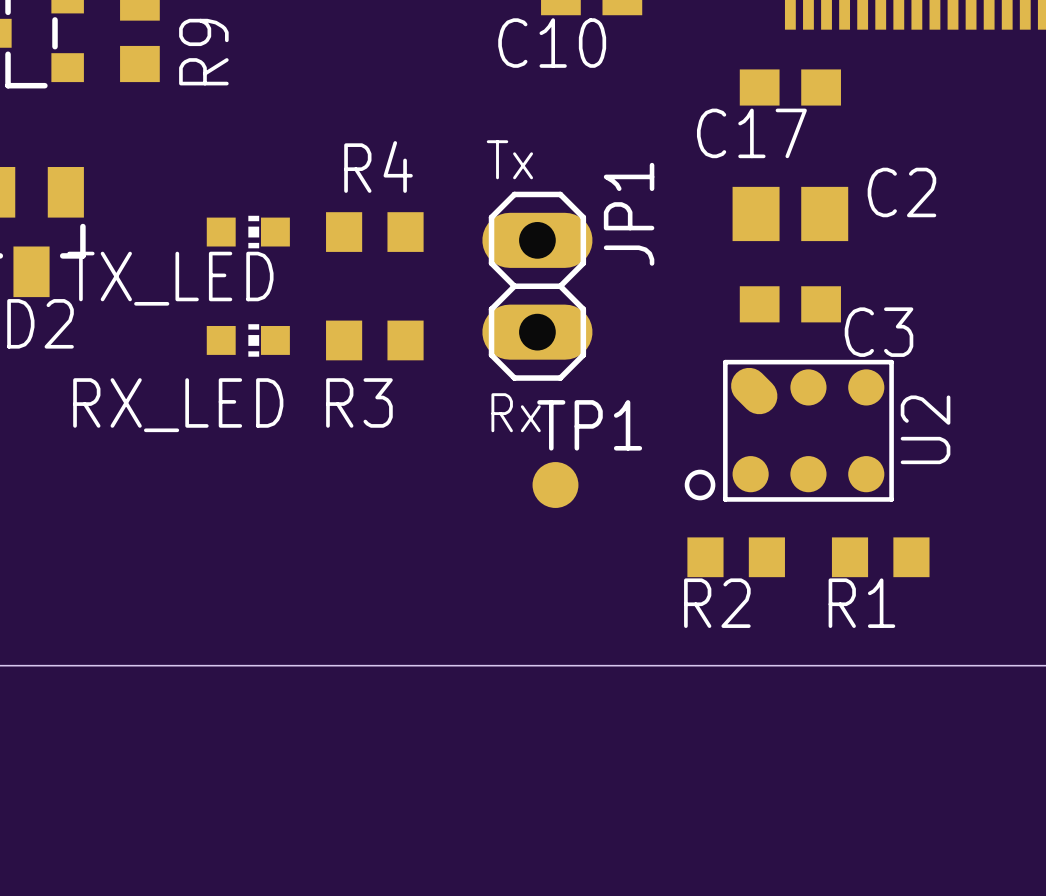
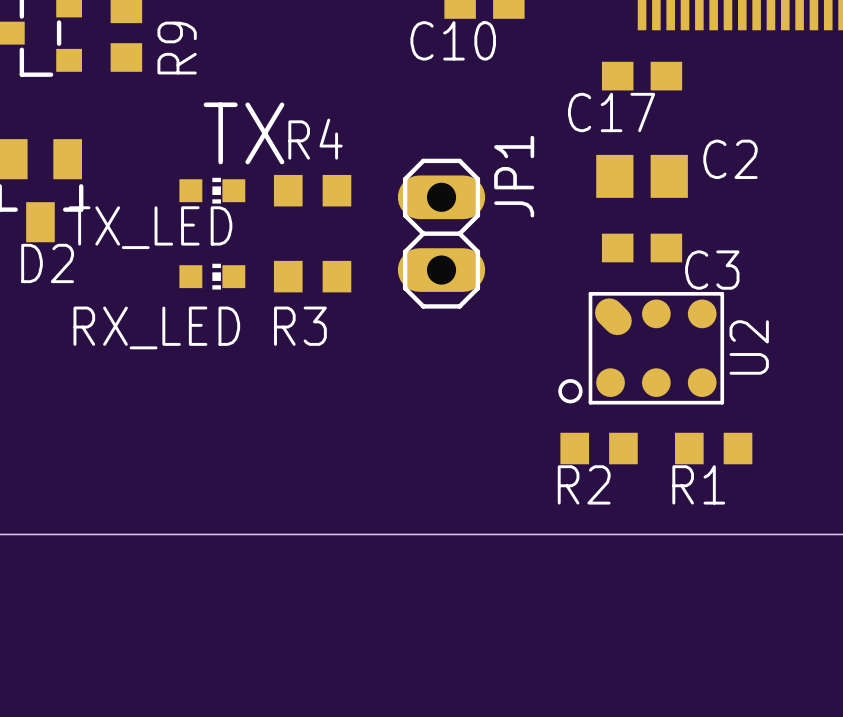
text: none -> TX (244, 133)
text: Tx (509, 159) -> none
text: Rx (516, 412) -> none
TP1: (555, 485) -> none

